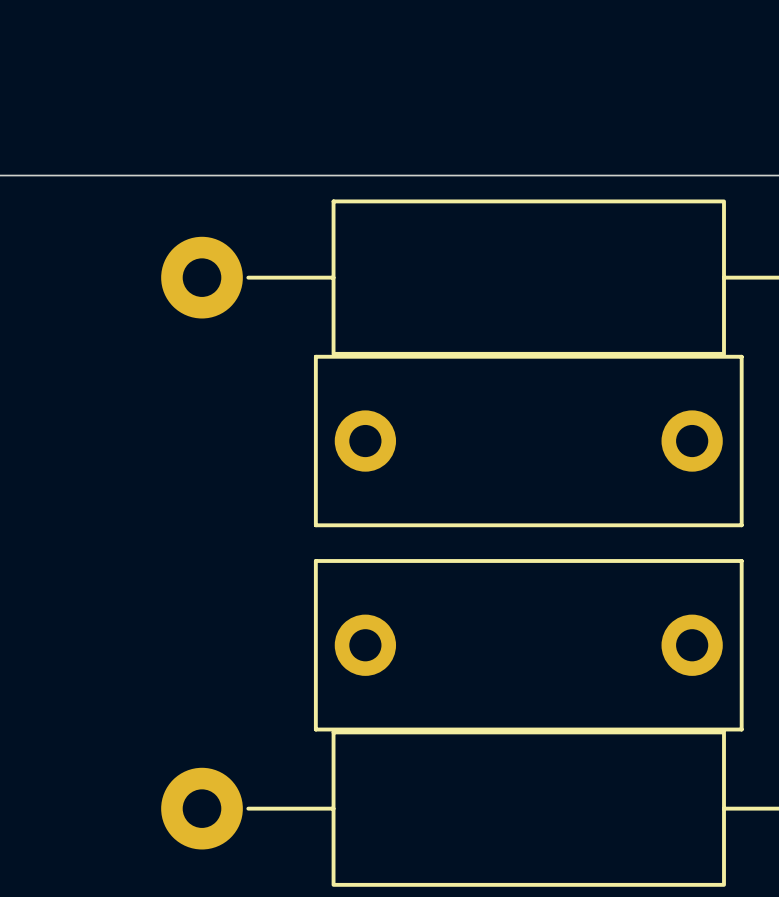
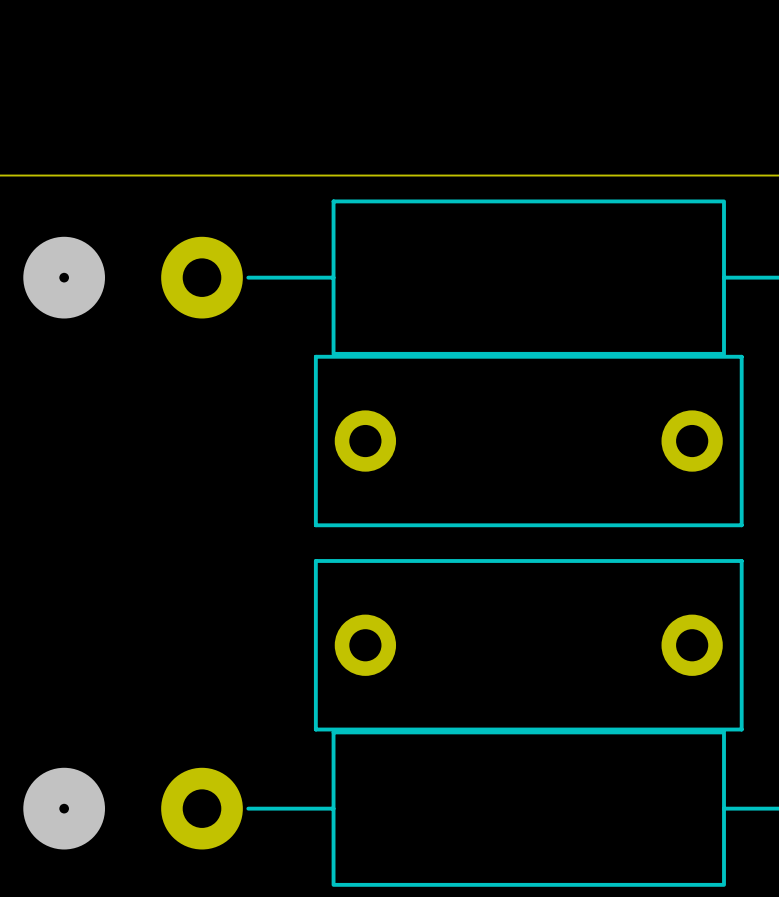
via: none -> (64, 277)
via: none -> (64, 808)

